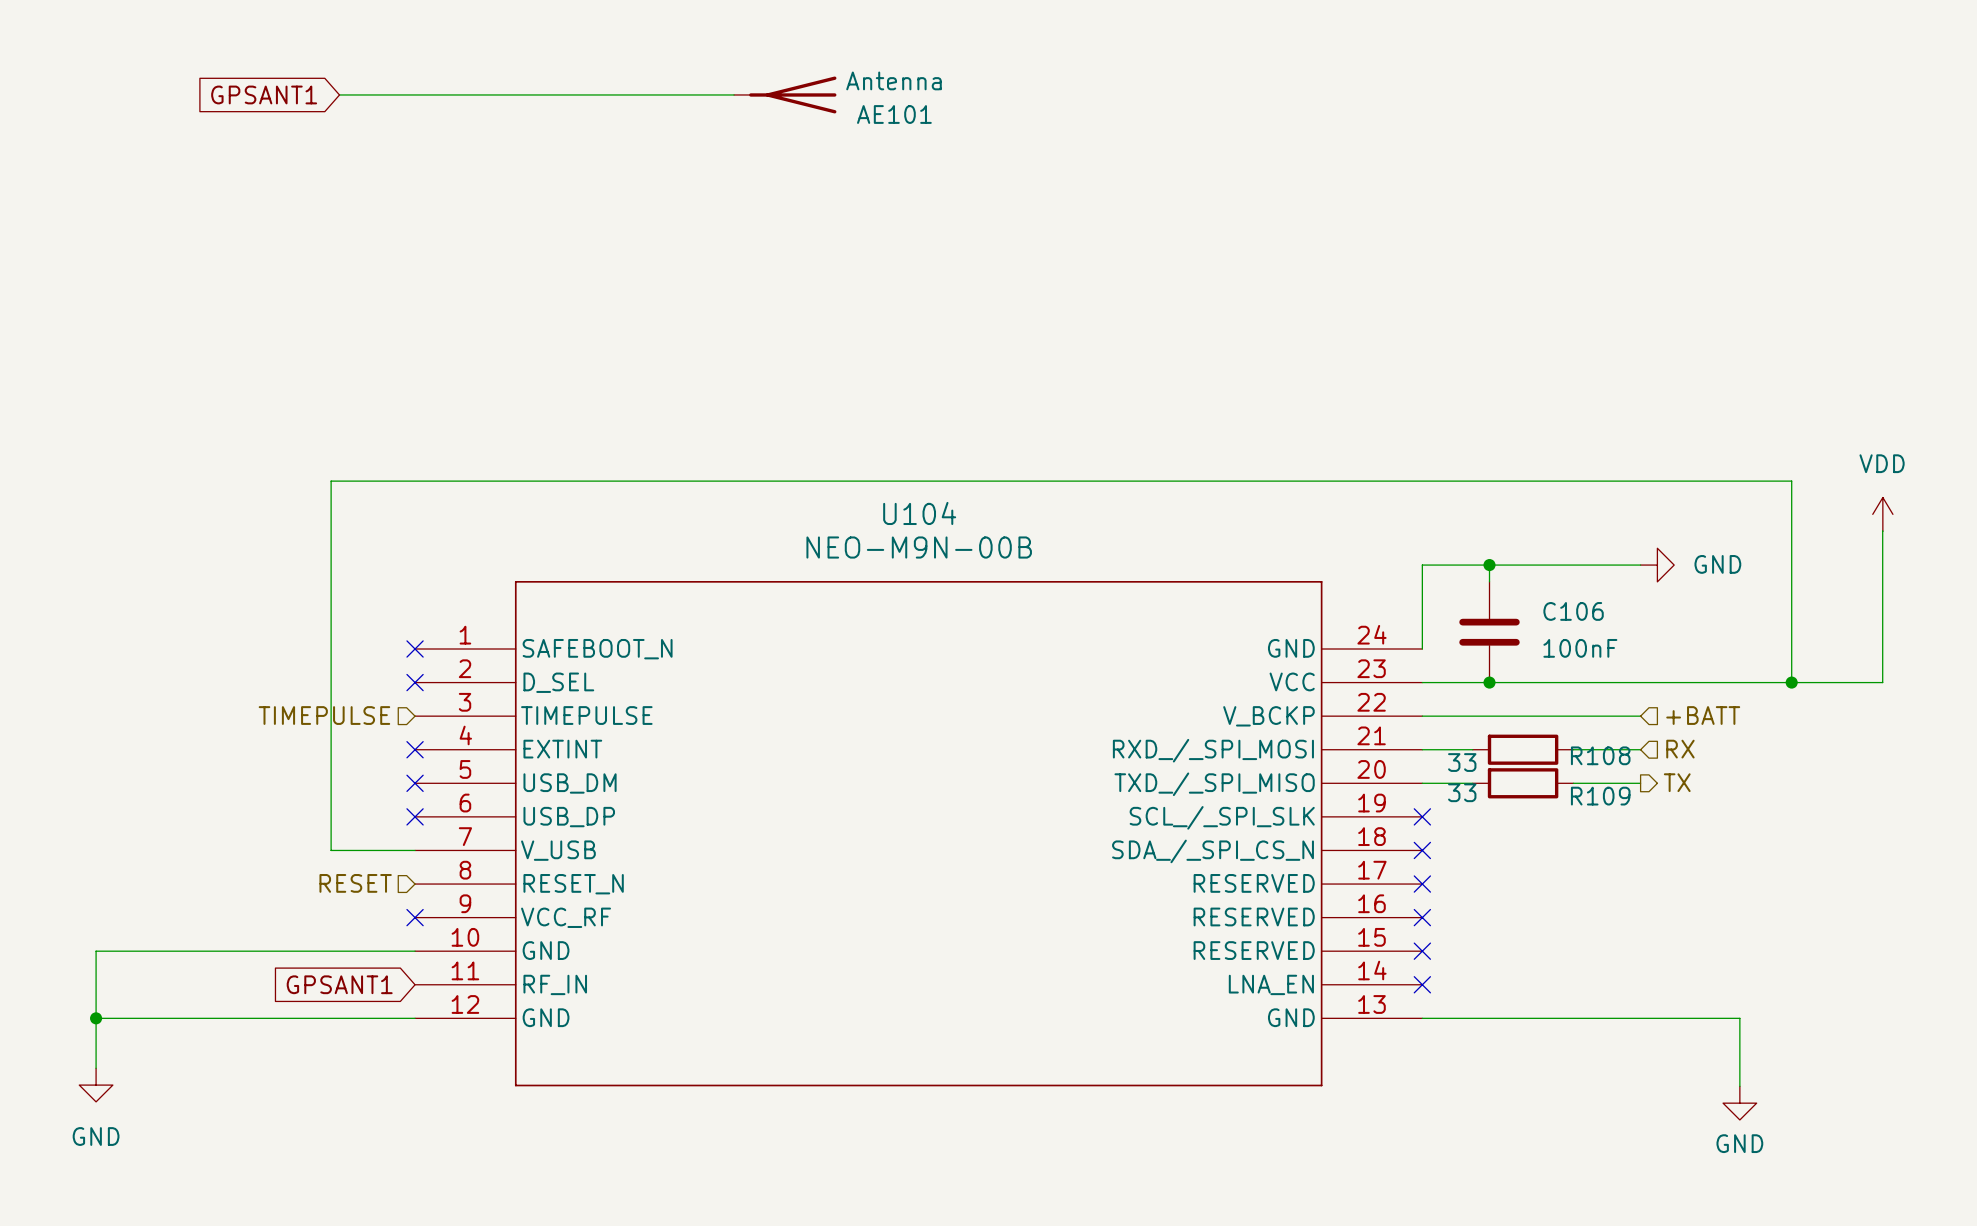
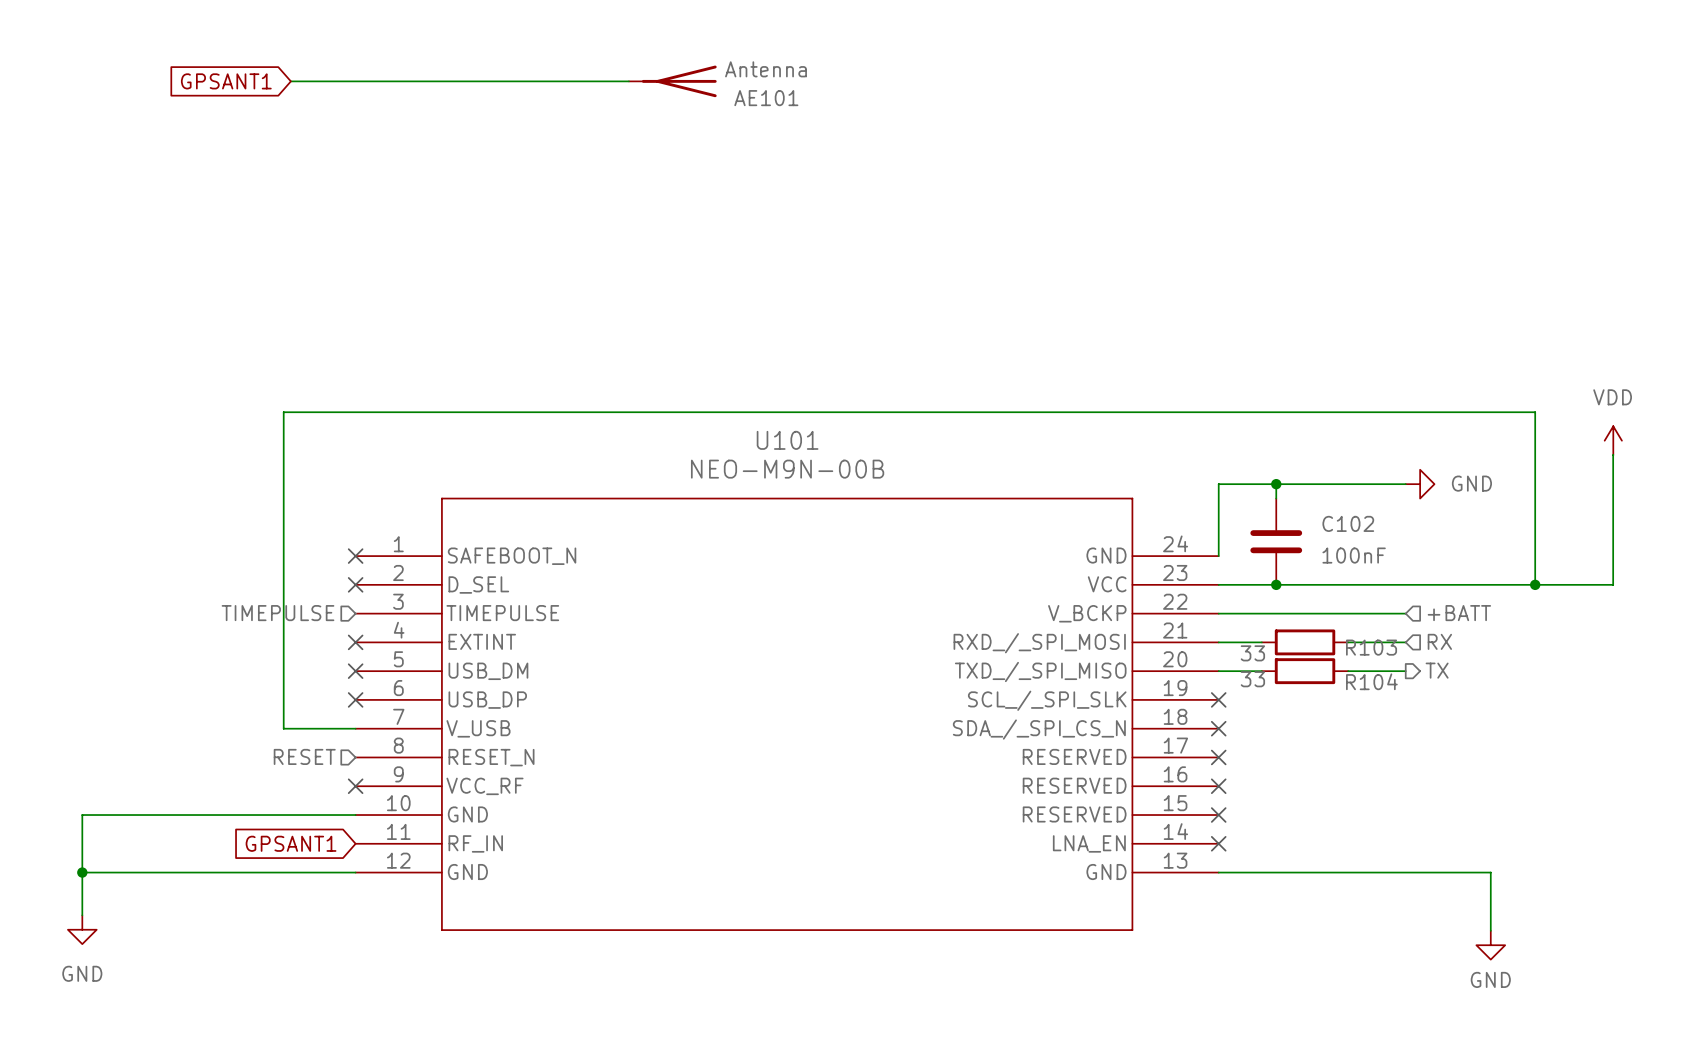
U104 name: U104 (919, 513) -> U101 (787, 440)
C106 name: C106 (1573, 611) -> C102 (1348, 523)
R108 name: R108 (1600, 755) -> R103 (1371, 647)
R109 name: R109 (1600, 796) -> R104 (1371, 681)

